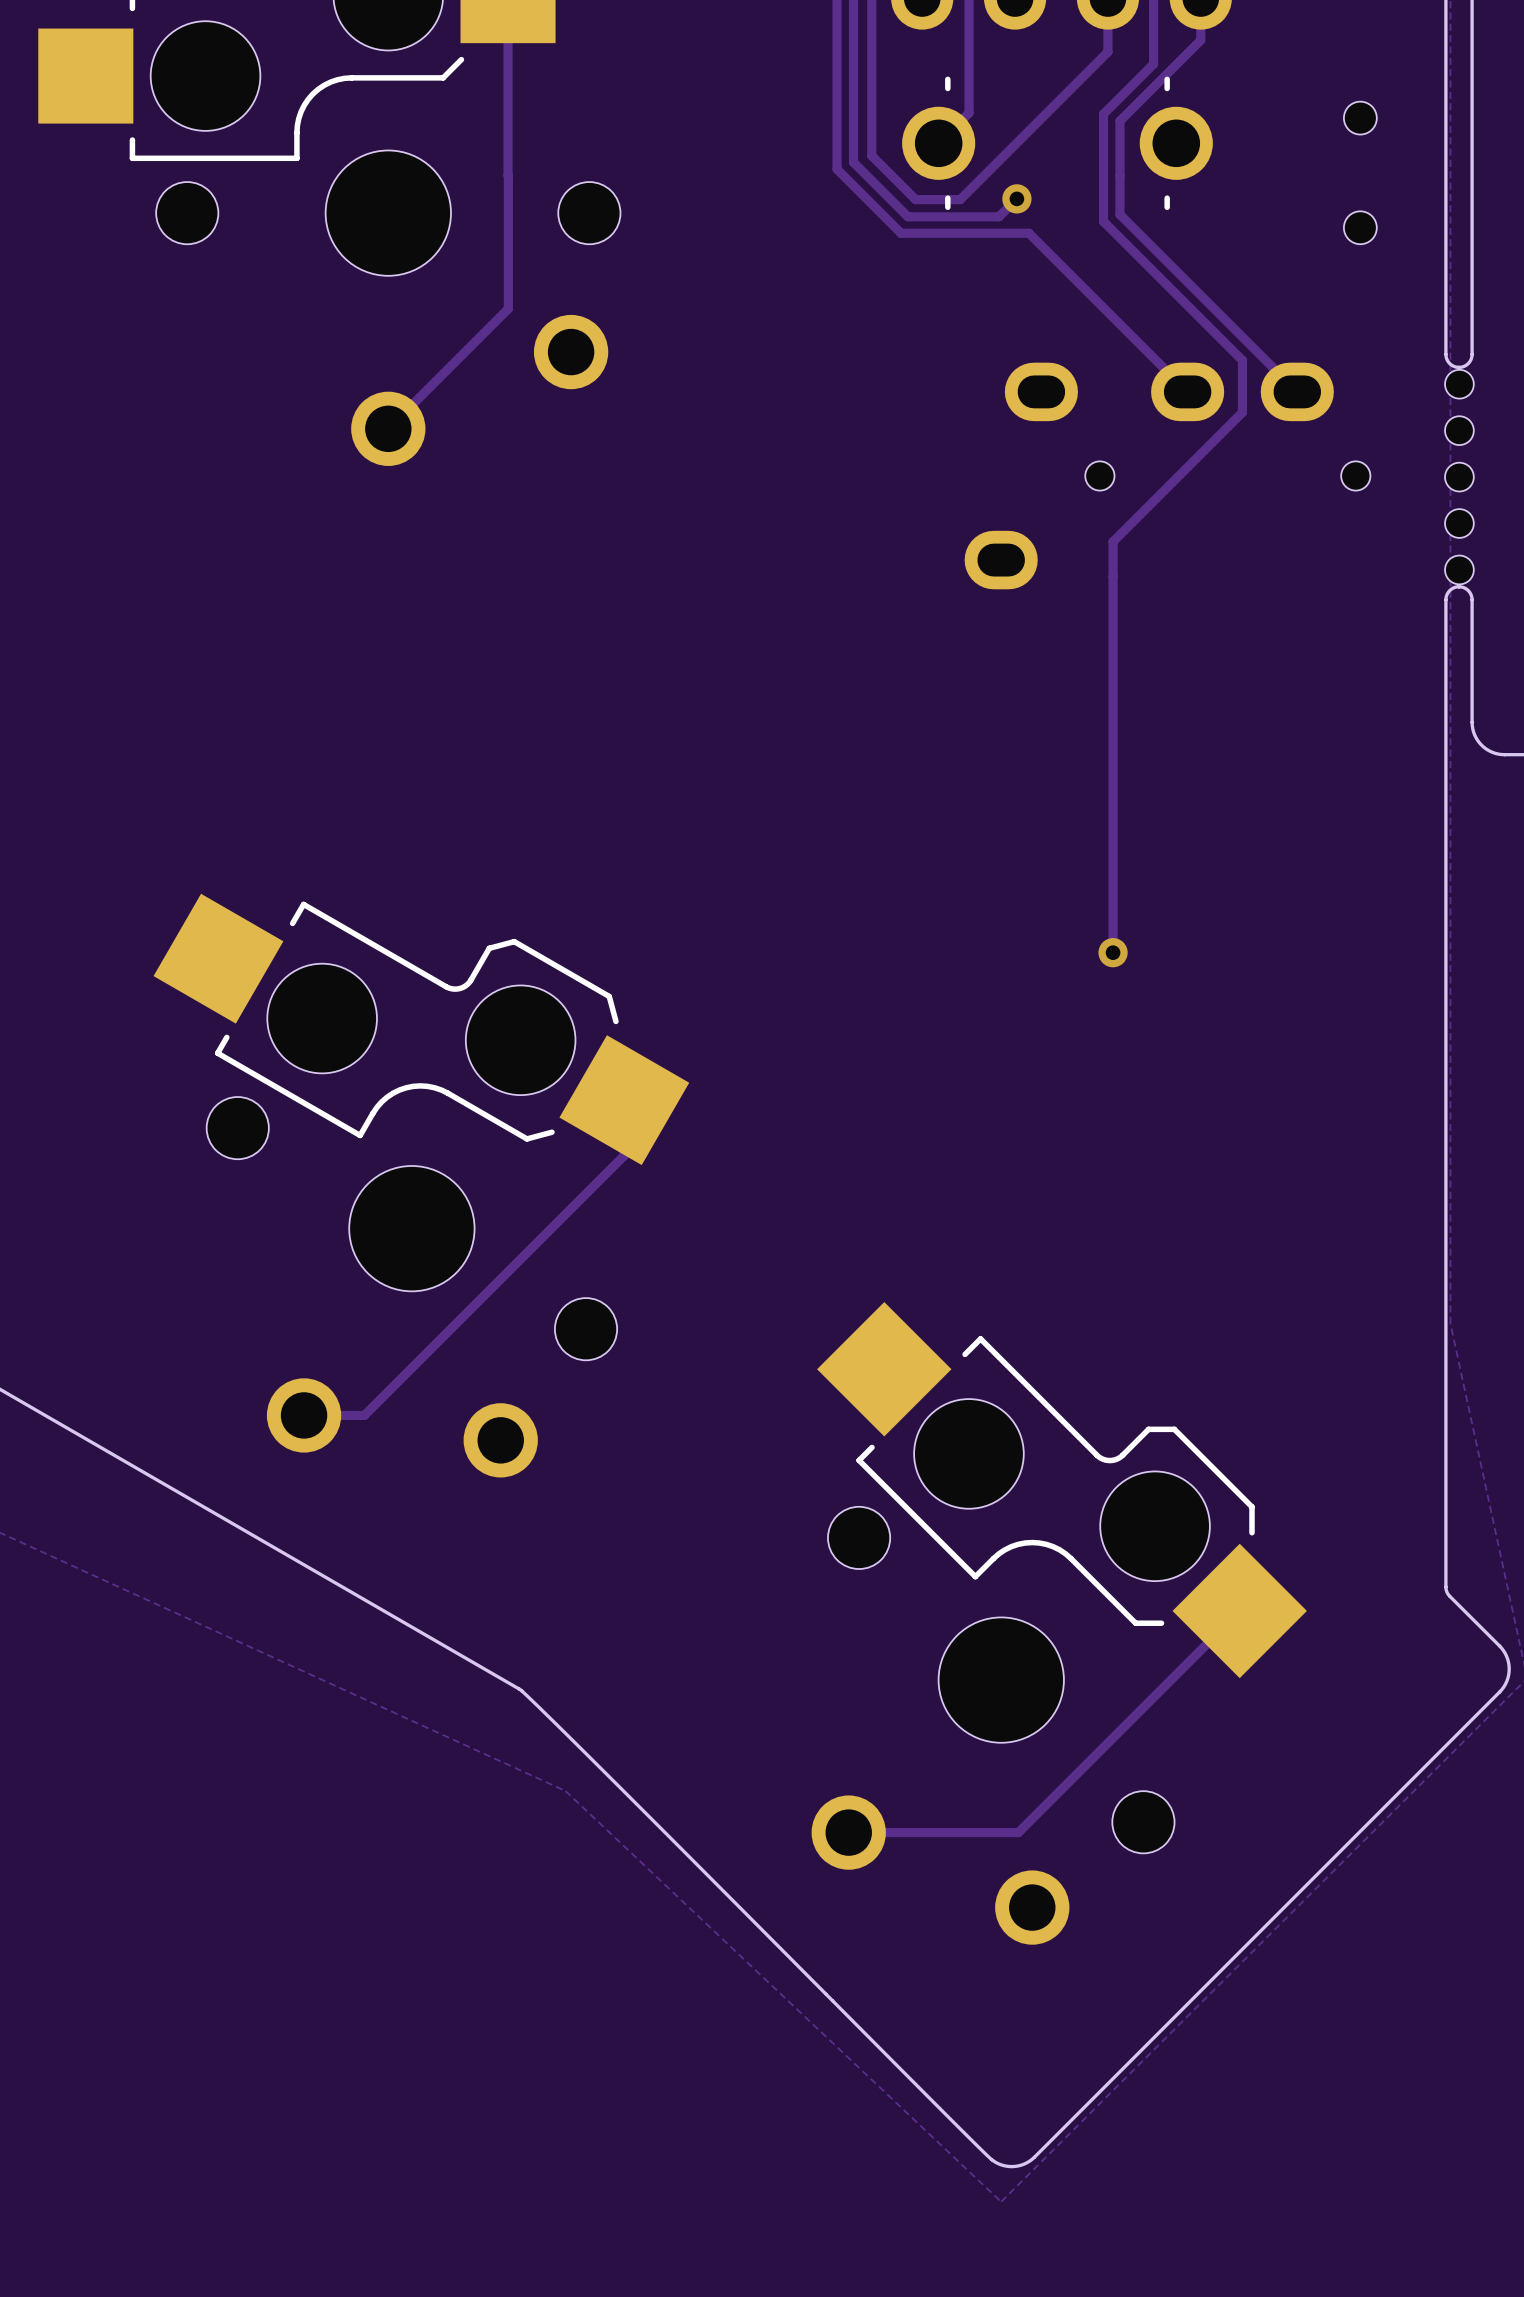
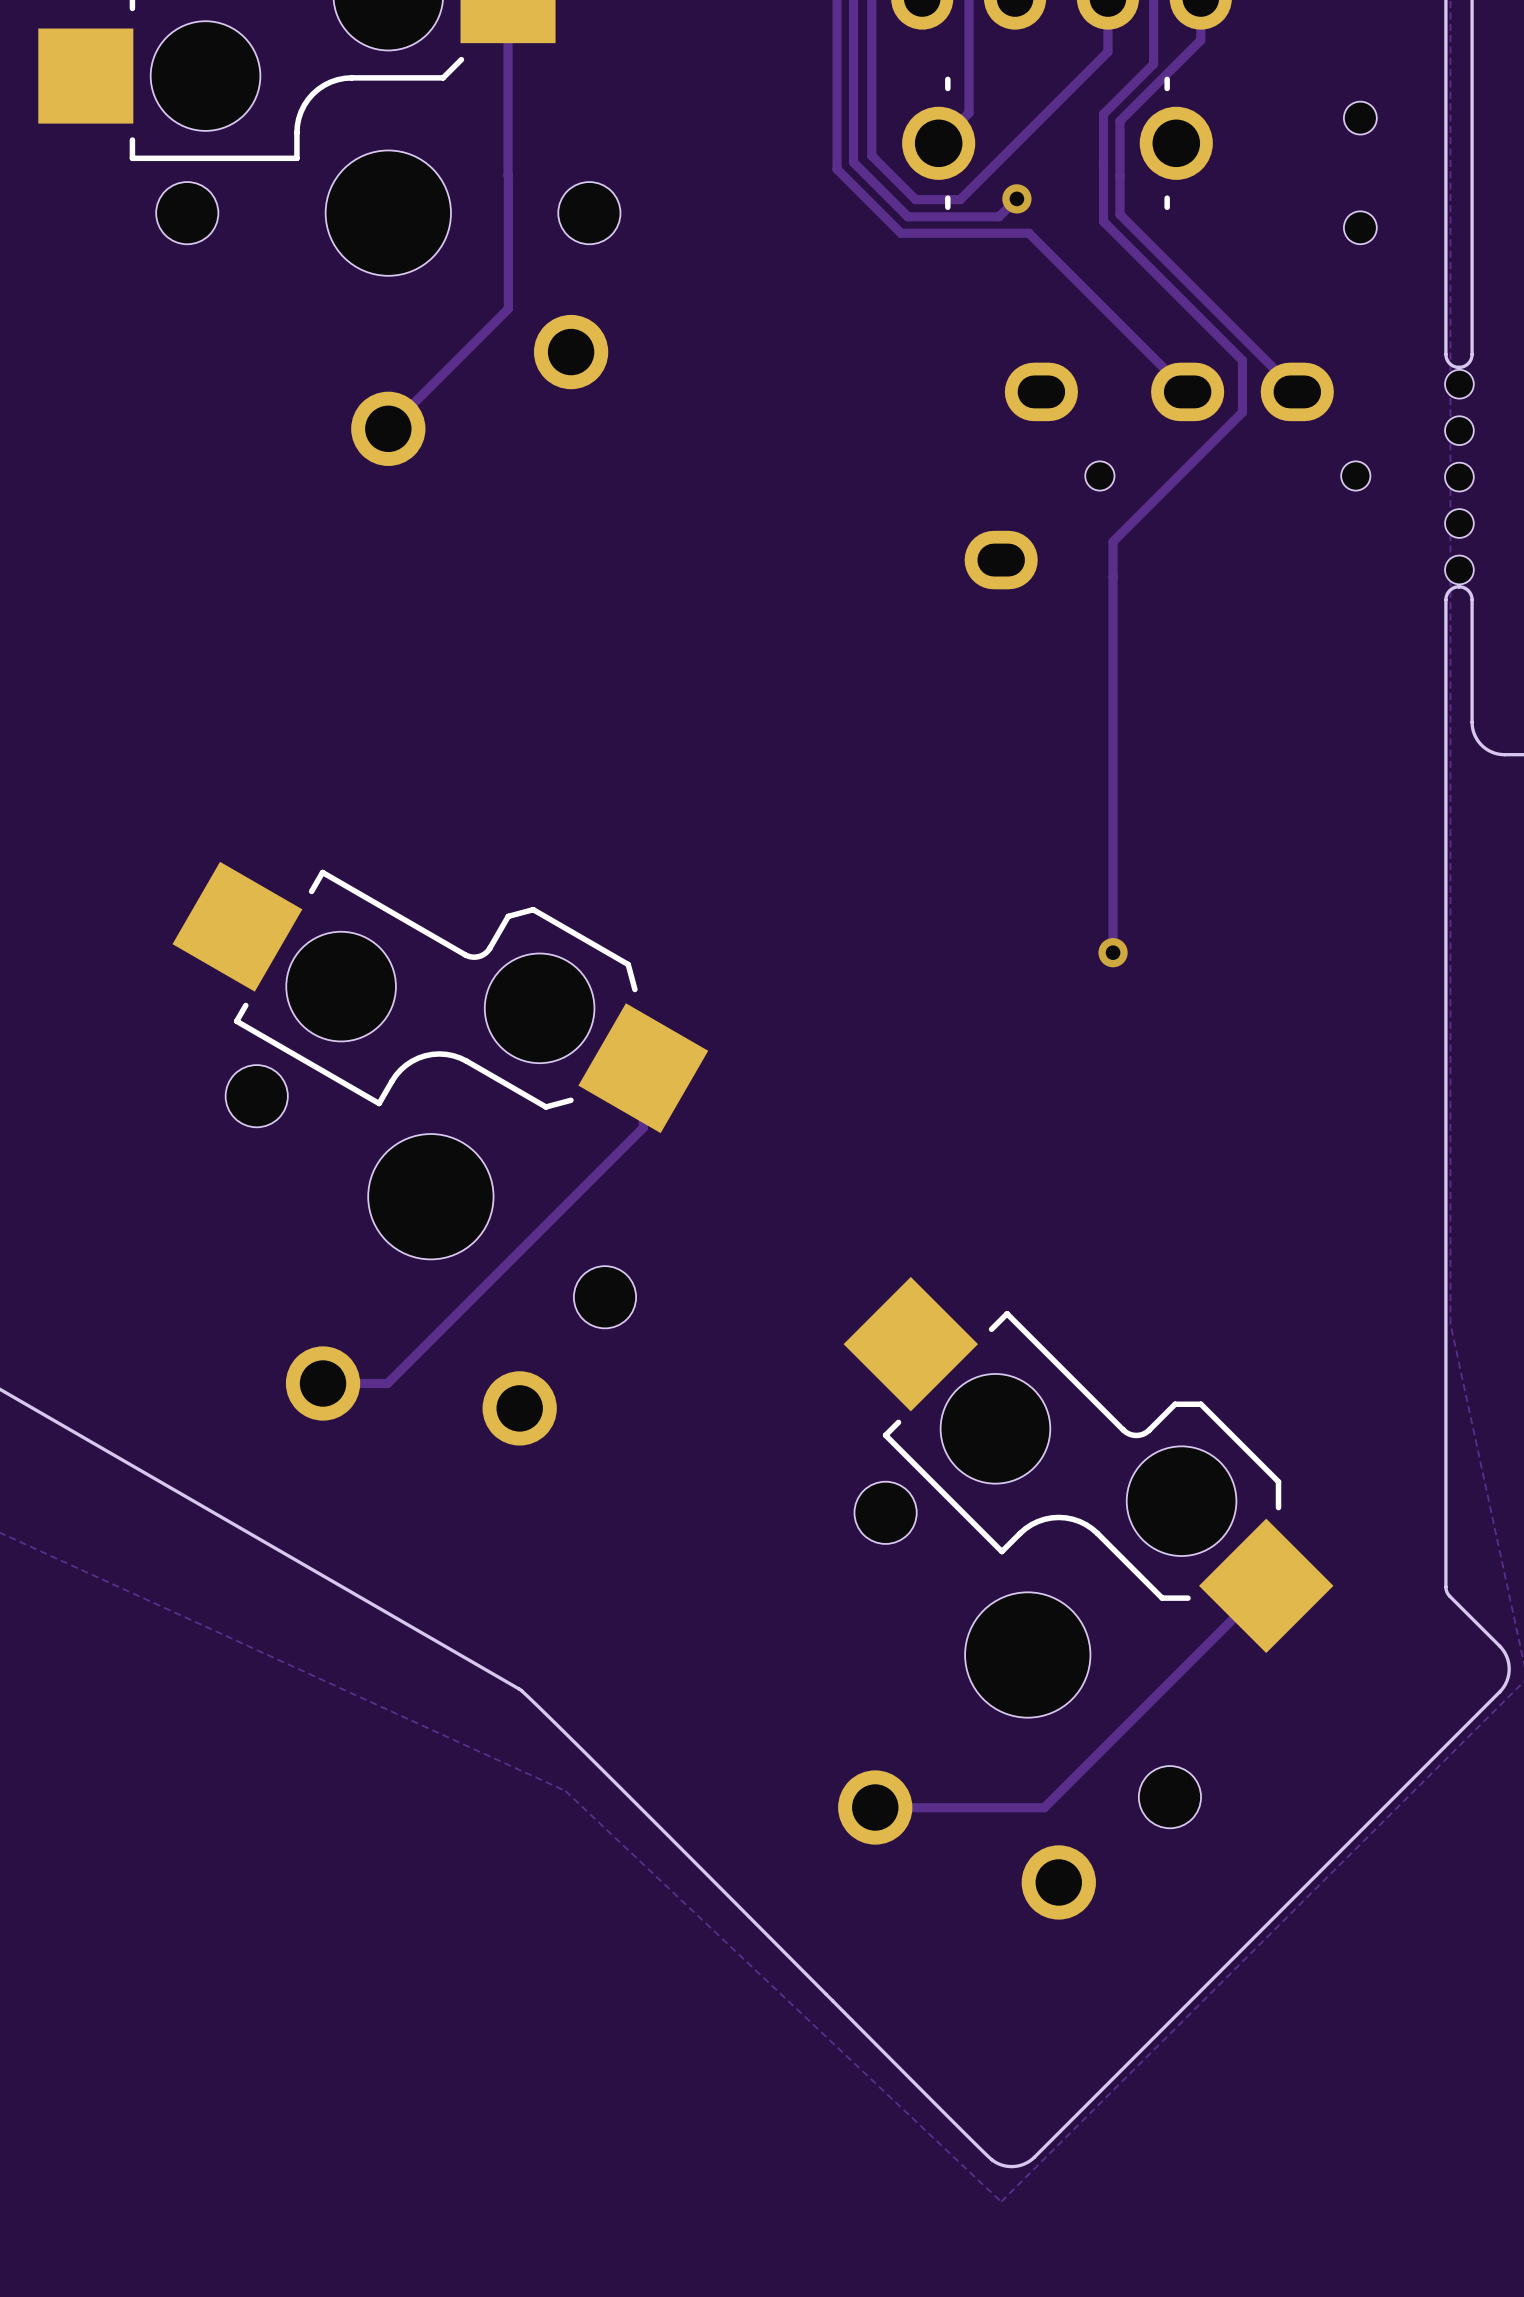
track: (624, 1100) (624, 1155) (364, 1415) (304, 1415) -> none
track: none -> (643, 1127) (387, 1383) (323, 1383)
part position: (421, 1185) -> (440, 1153)
track: none -> (1266, 1585) (1044, 1807) (875, 1807)
track: (1239, 1611) (1018, 1832) (848, 1832) -> none
part position: (1059, 1623) -> (1085, 1598)

